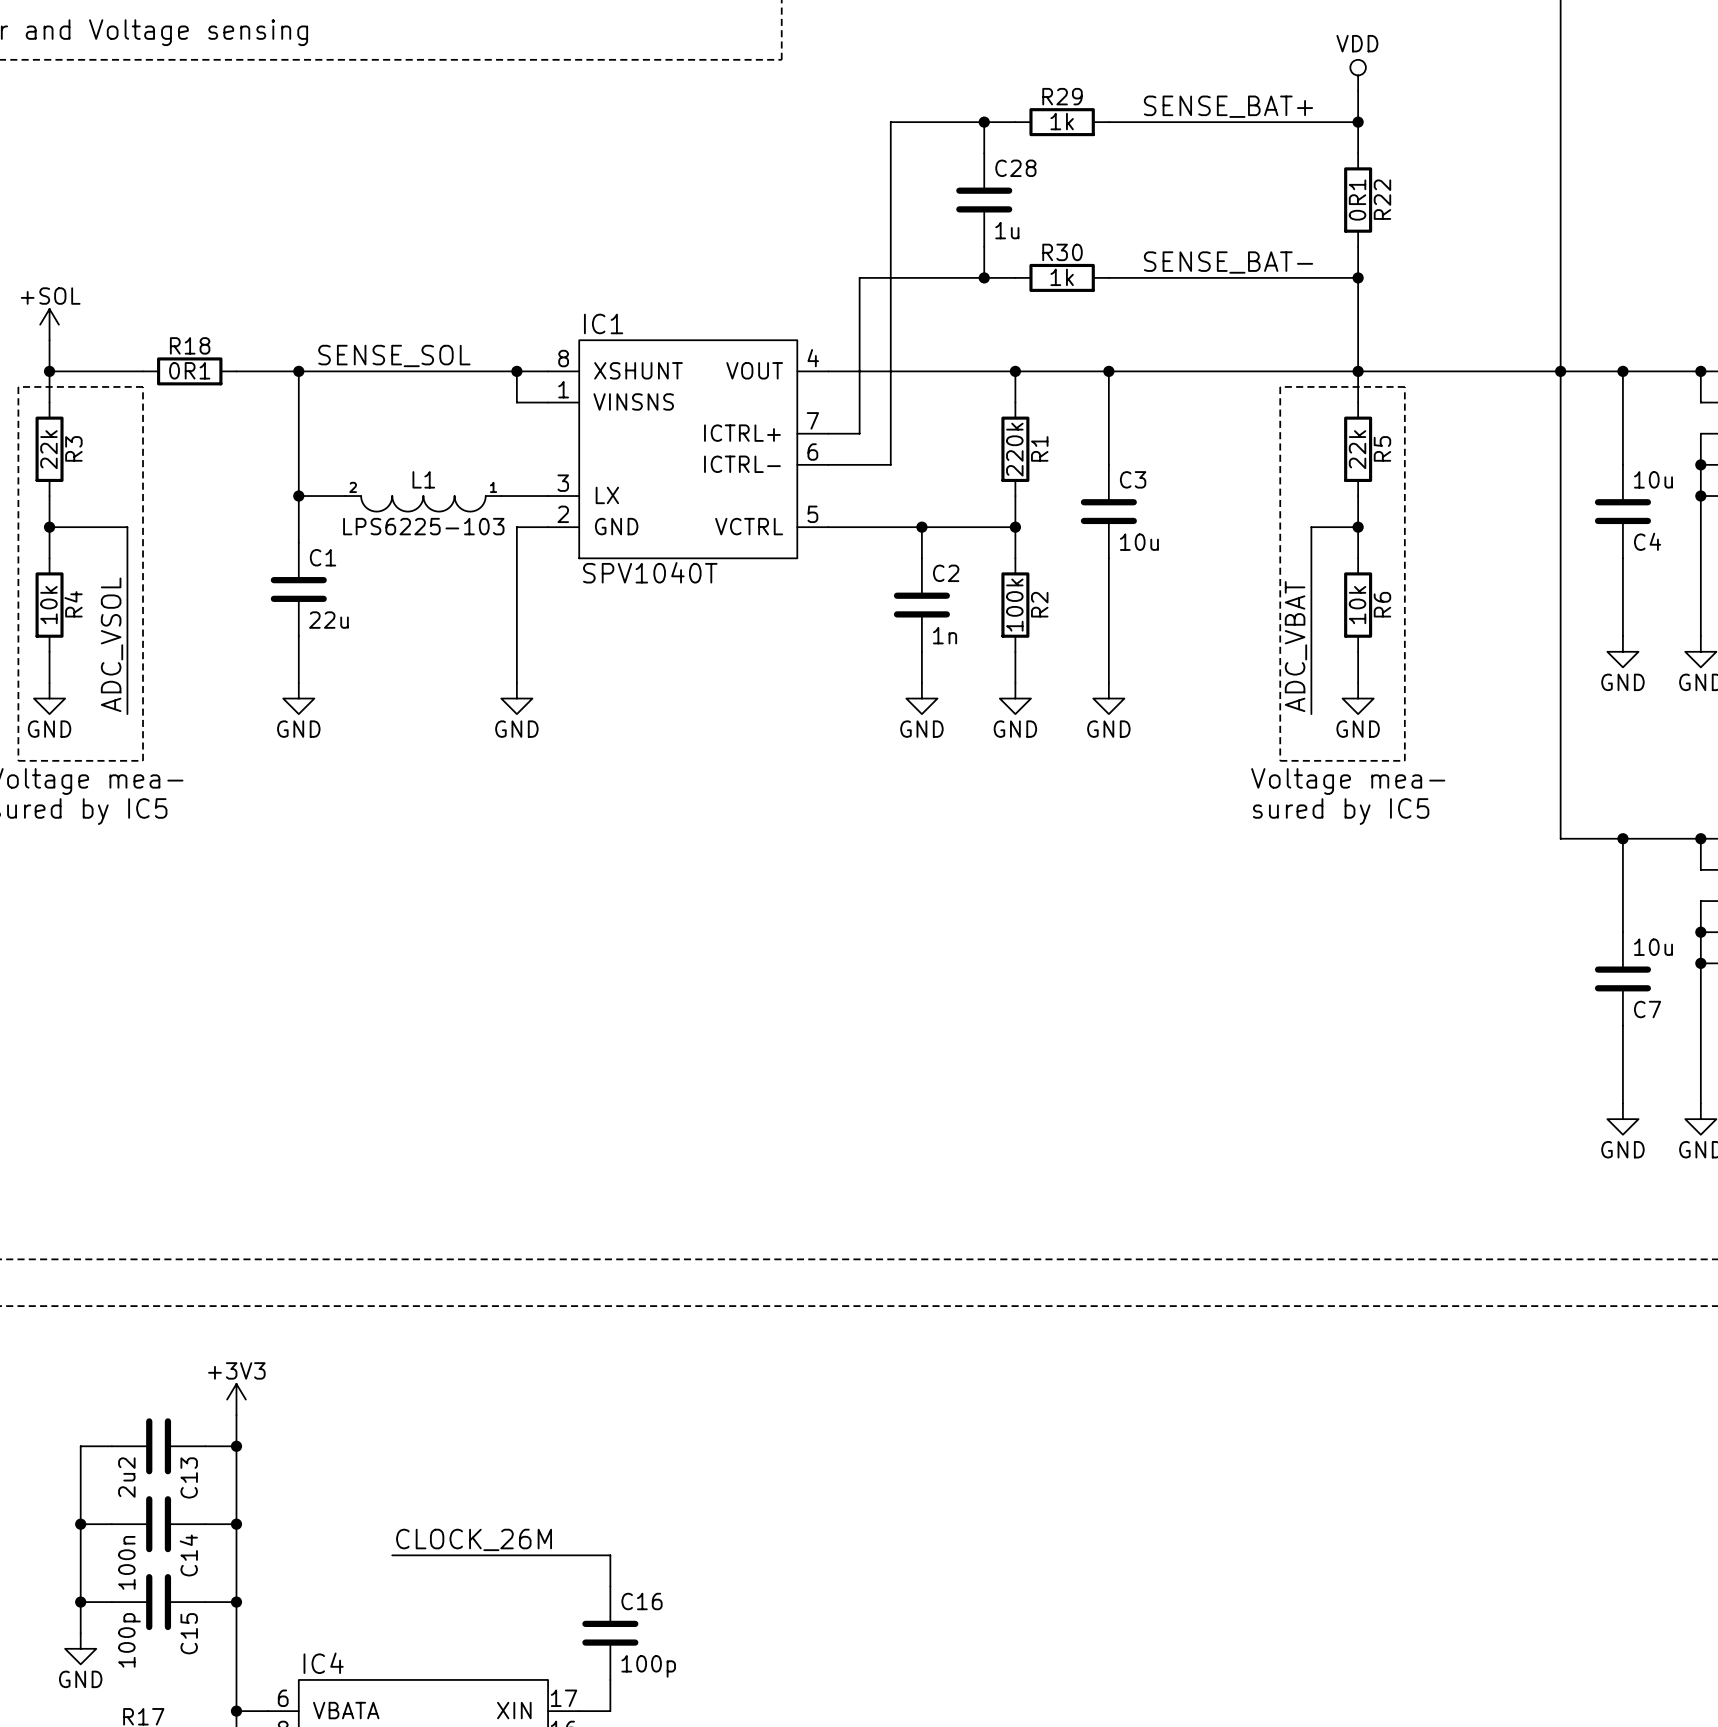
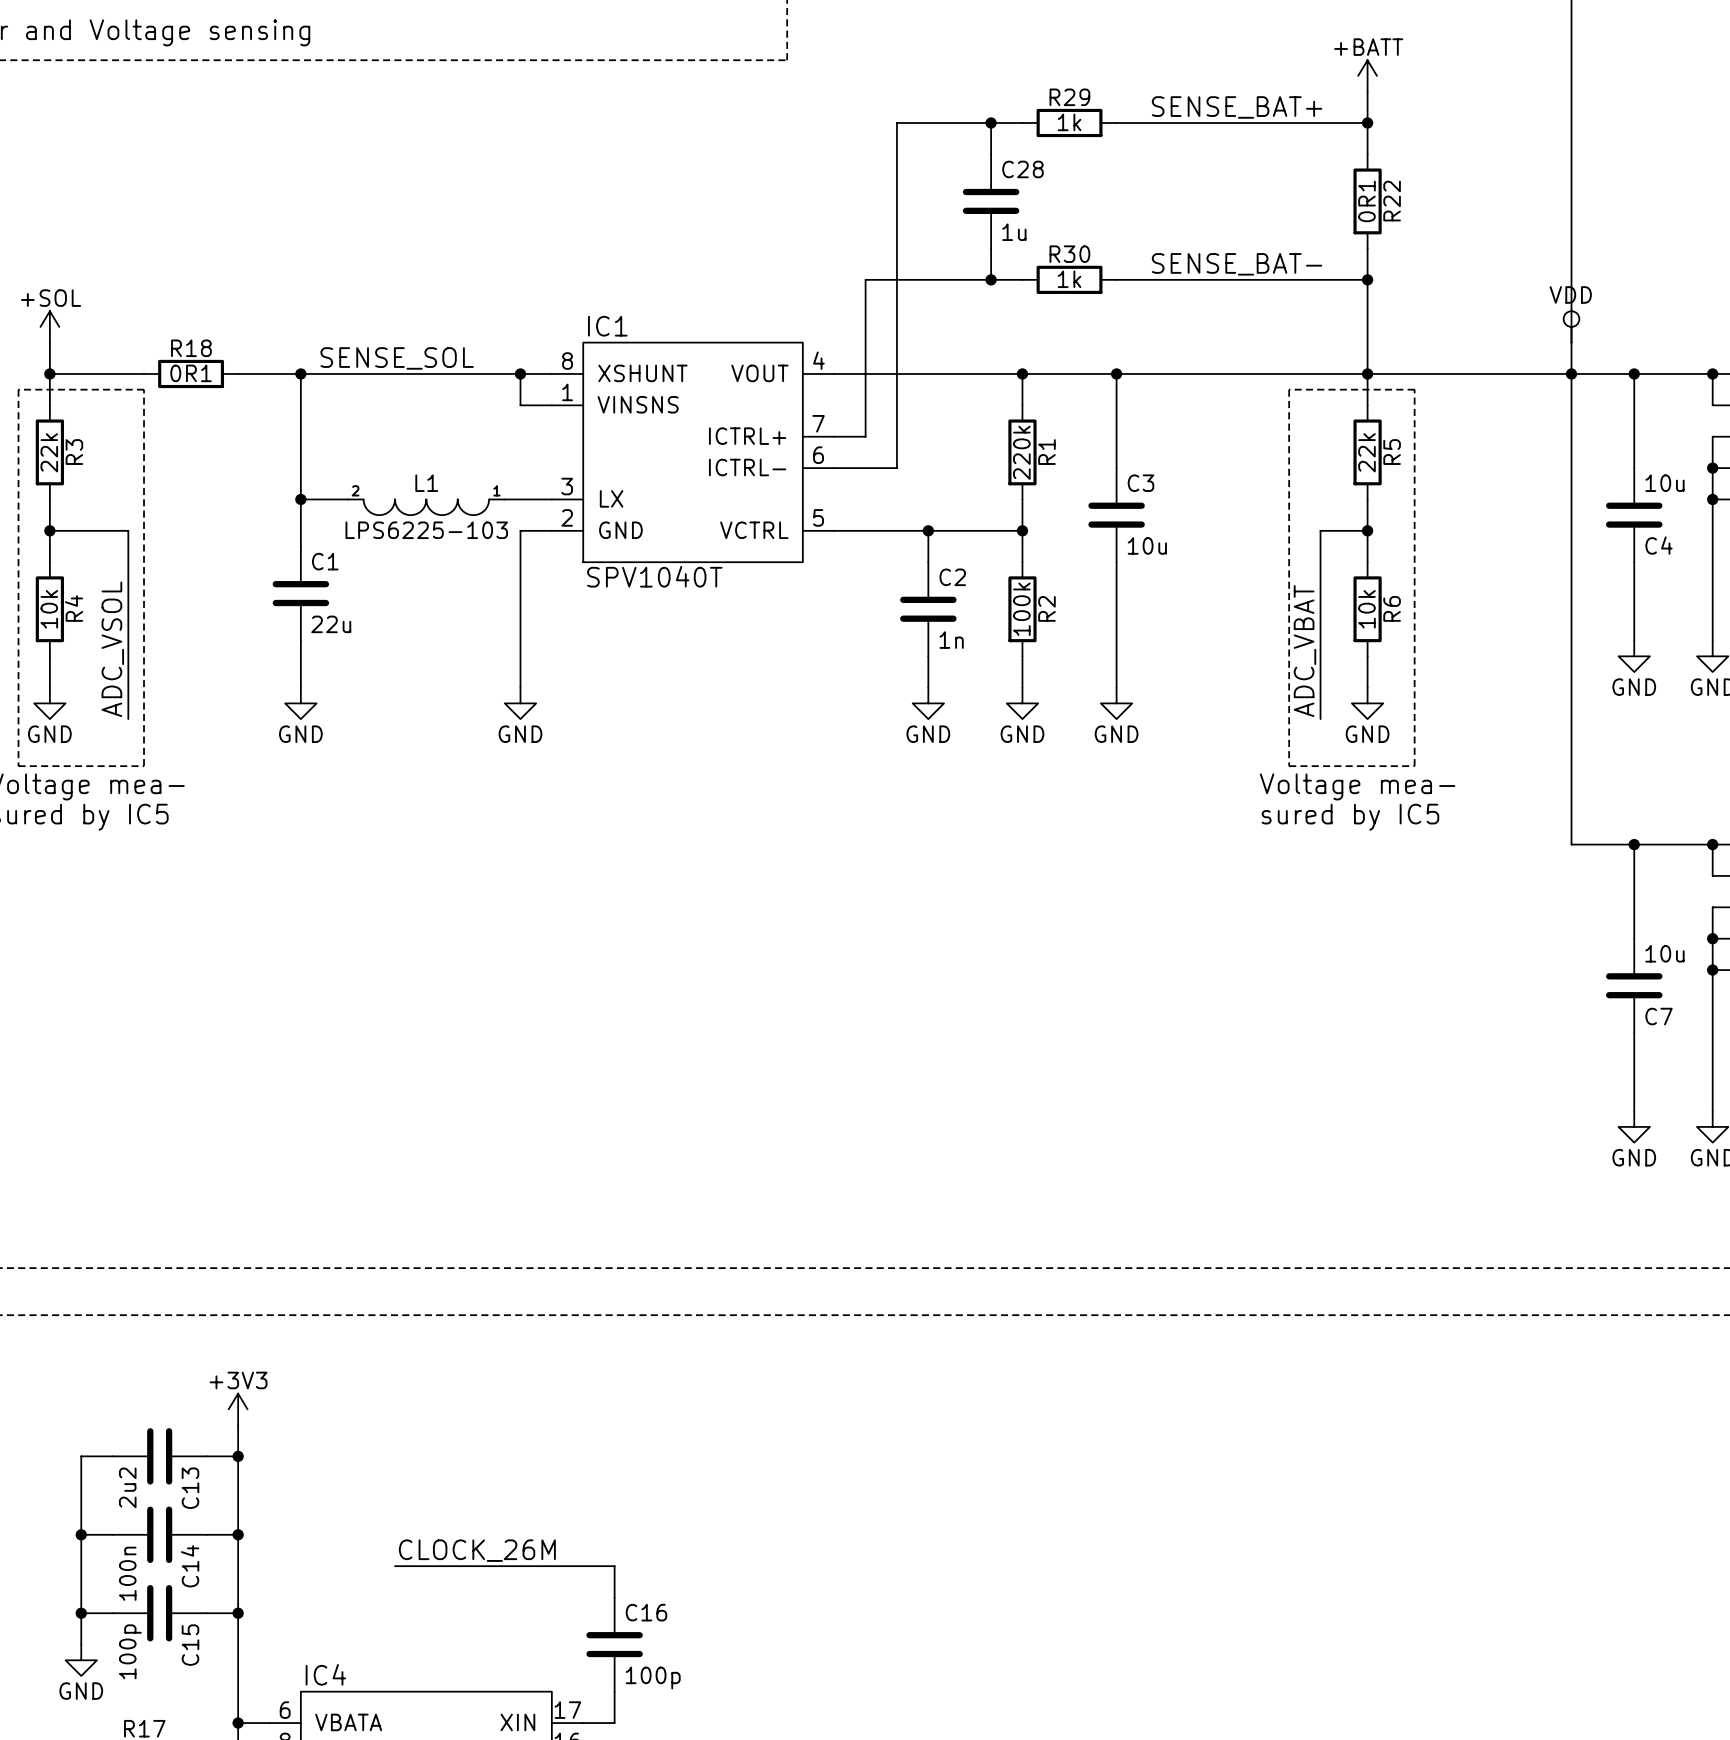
power symbol: VDD (1358, 75) -> +BATT (1367, 75)
power symbol: none -> VDD (1571, 326)

